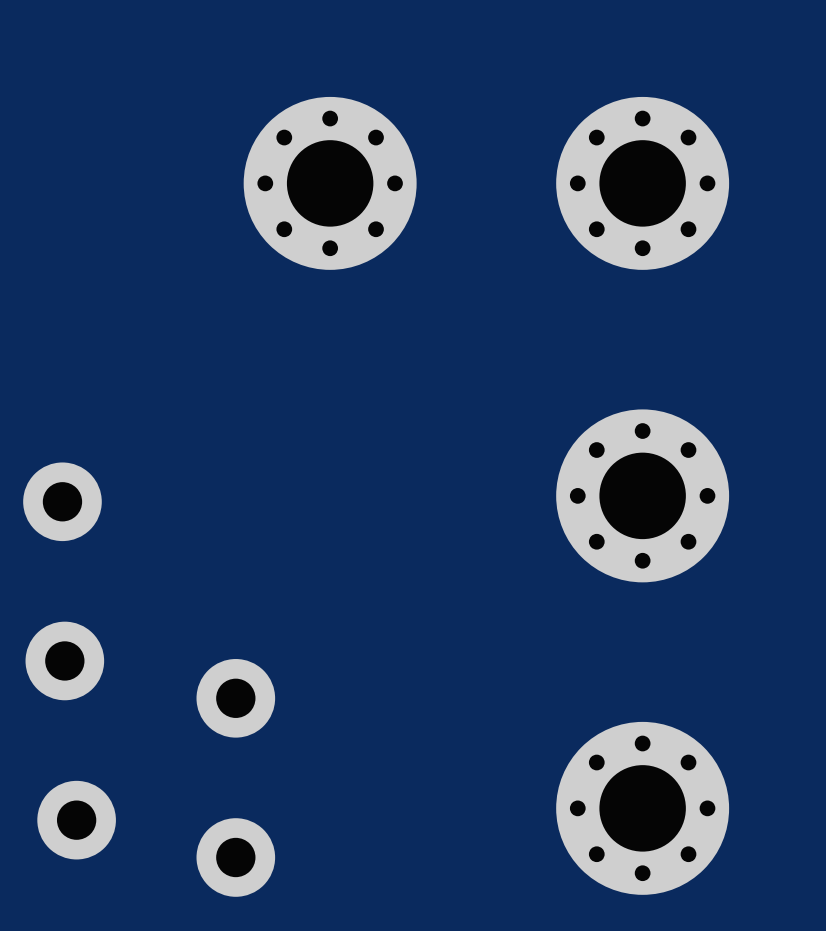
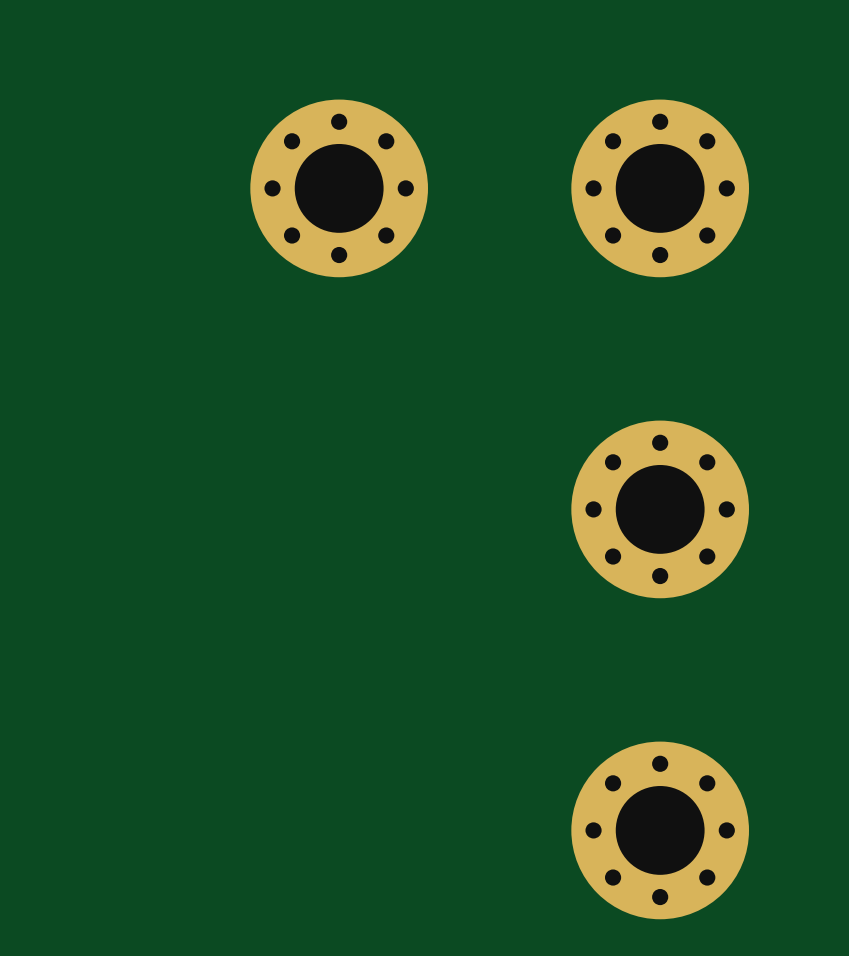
part: (62, 501) -> none
part: (64, 660) -> none
part: (235, 698) -> none
part: (76, 820) -> none
part: (235, 857) -> none

